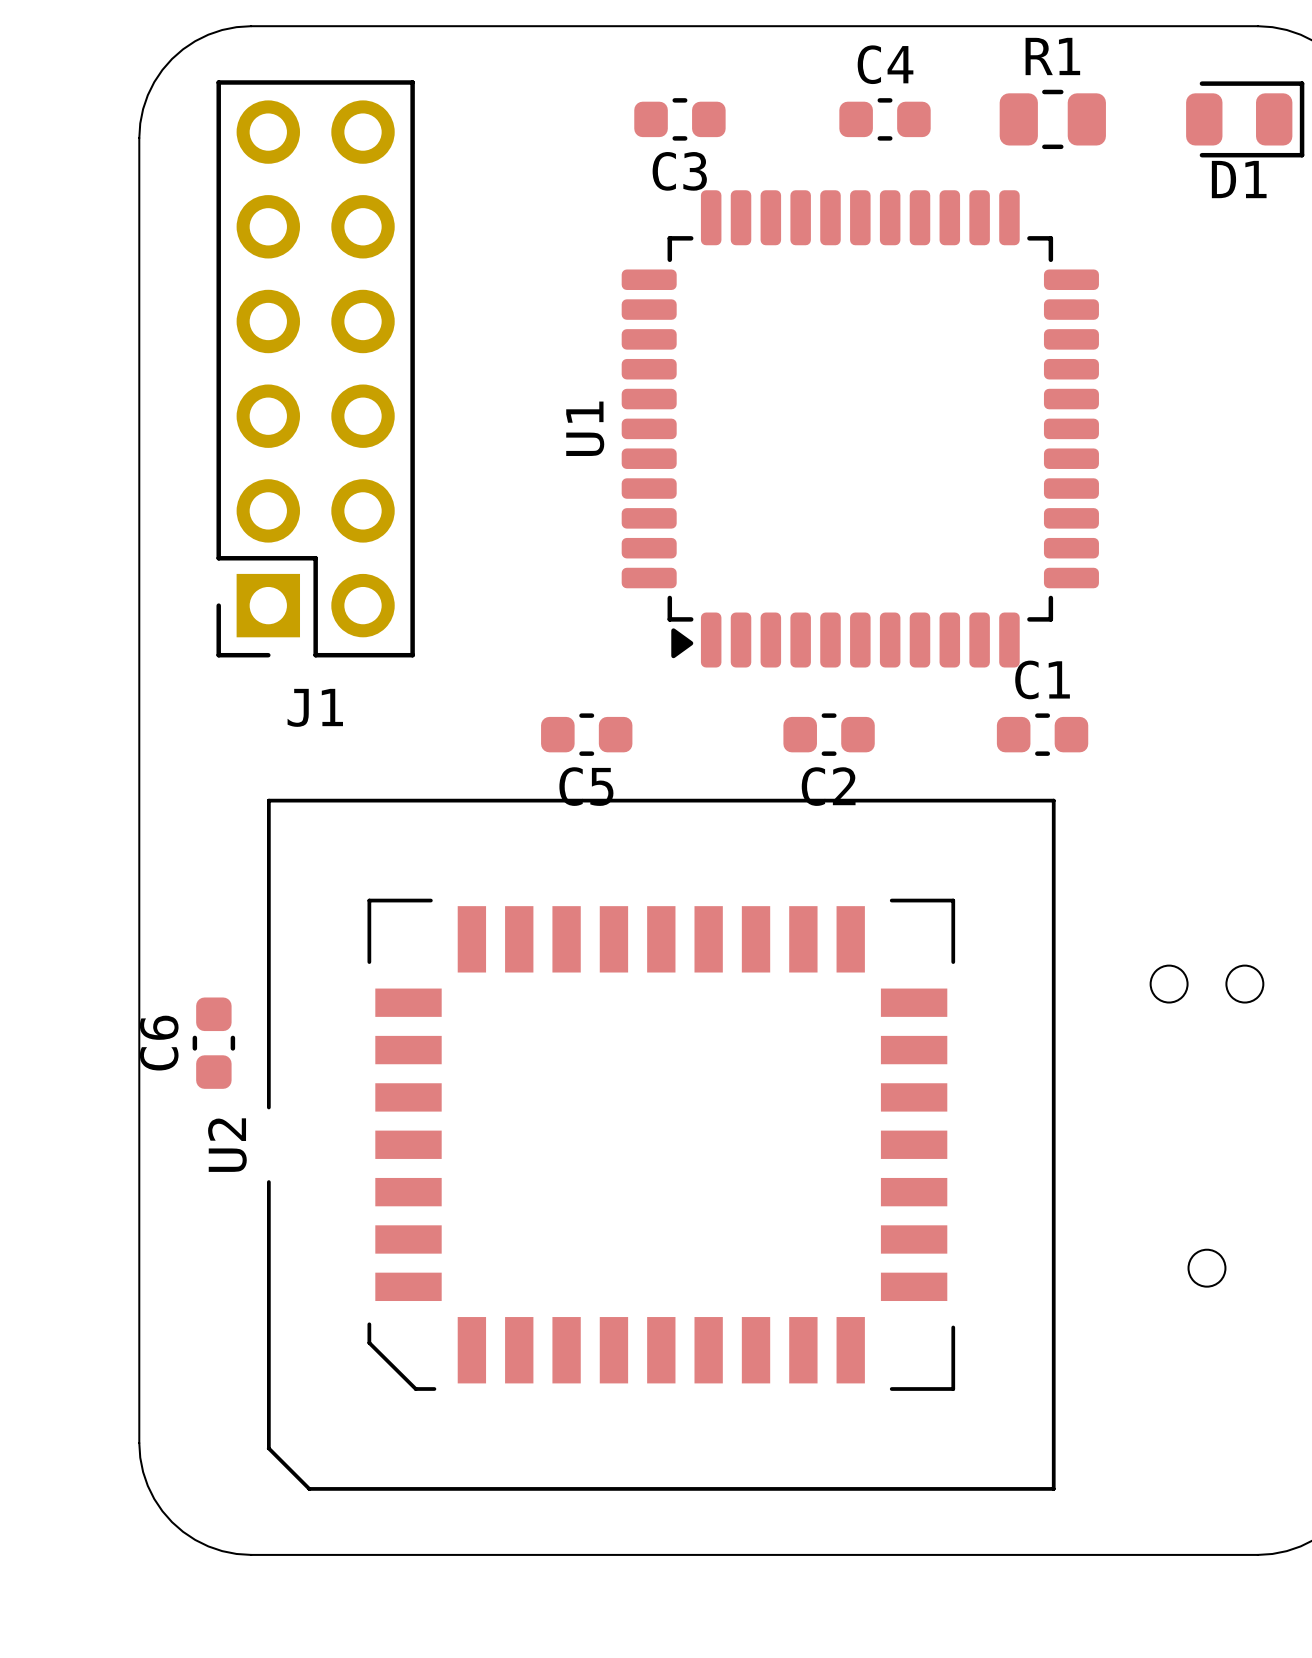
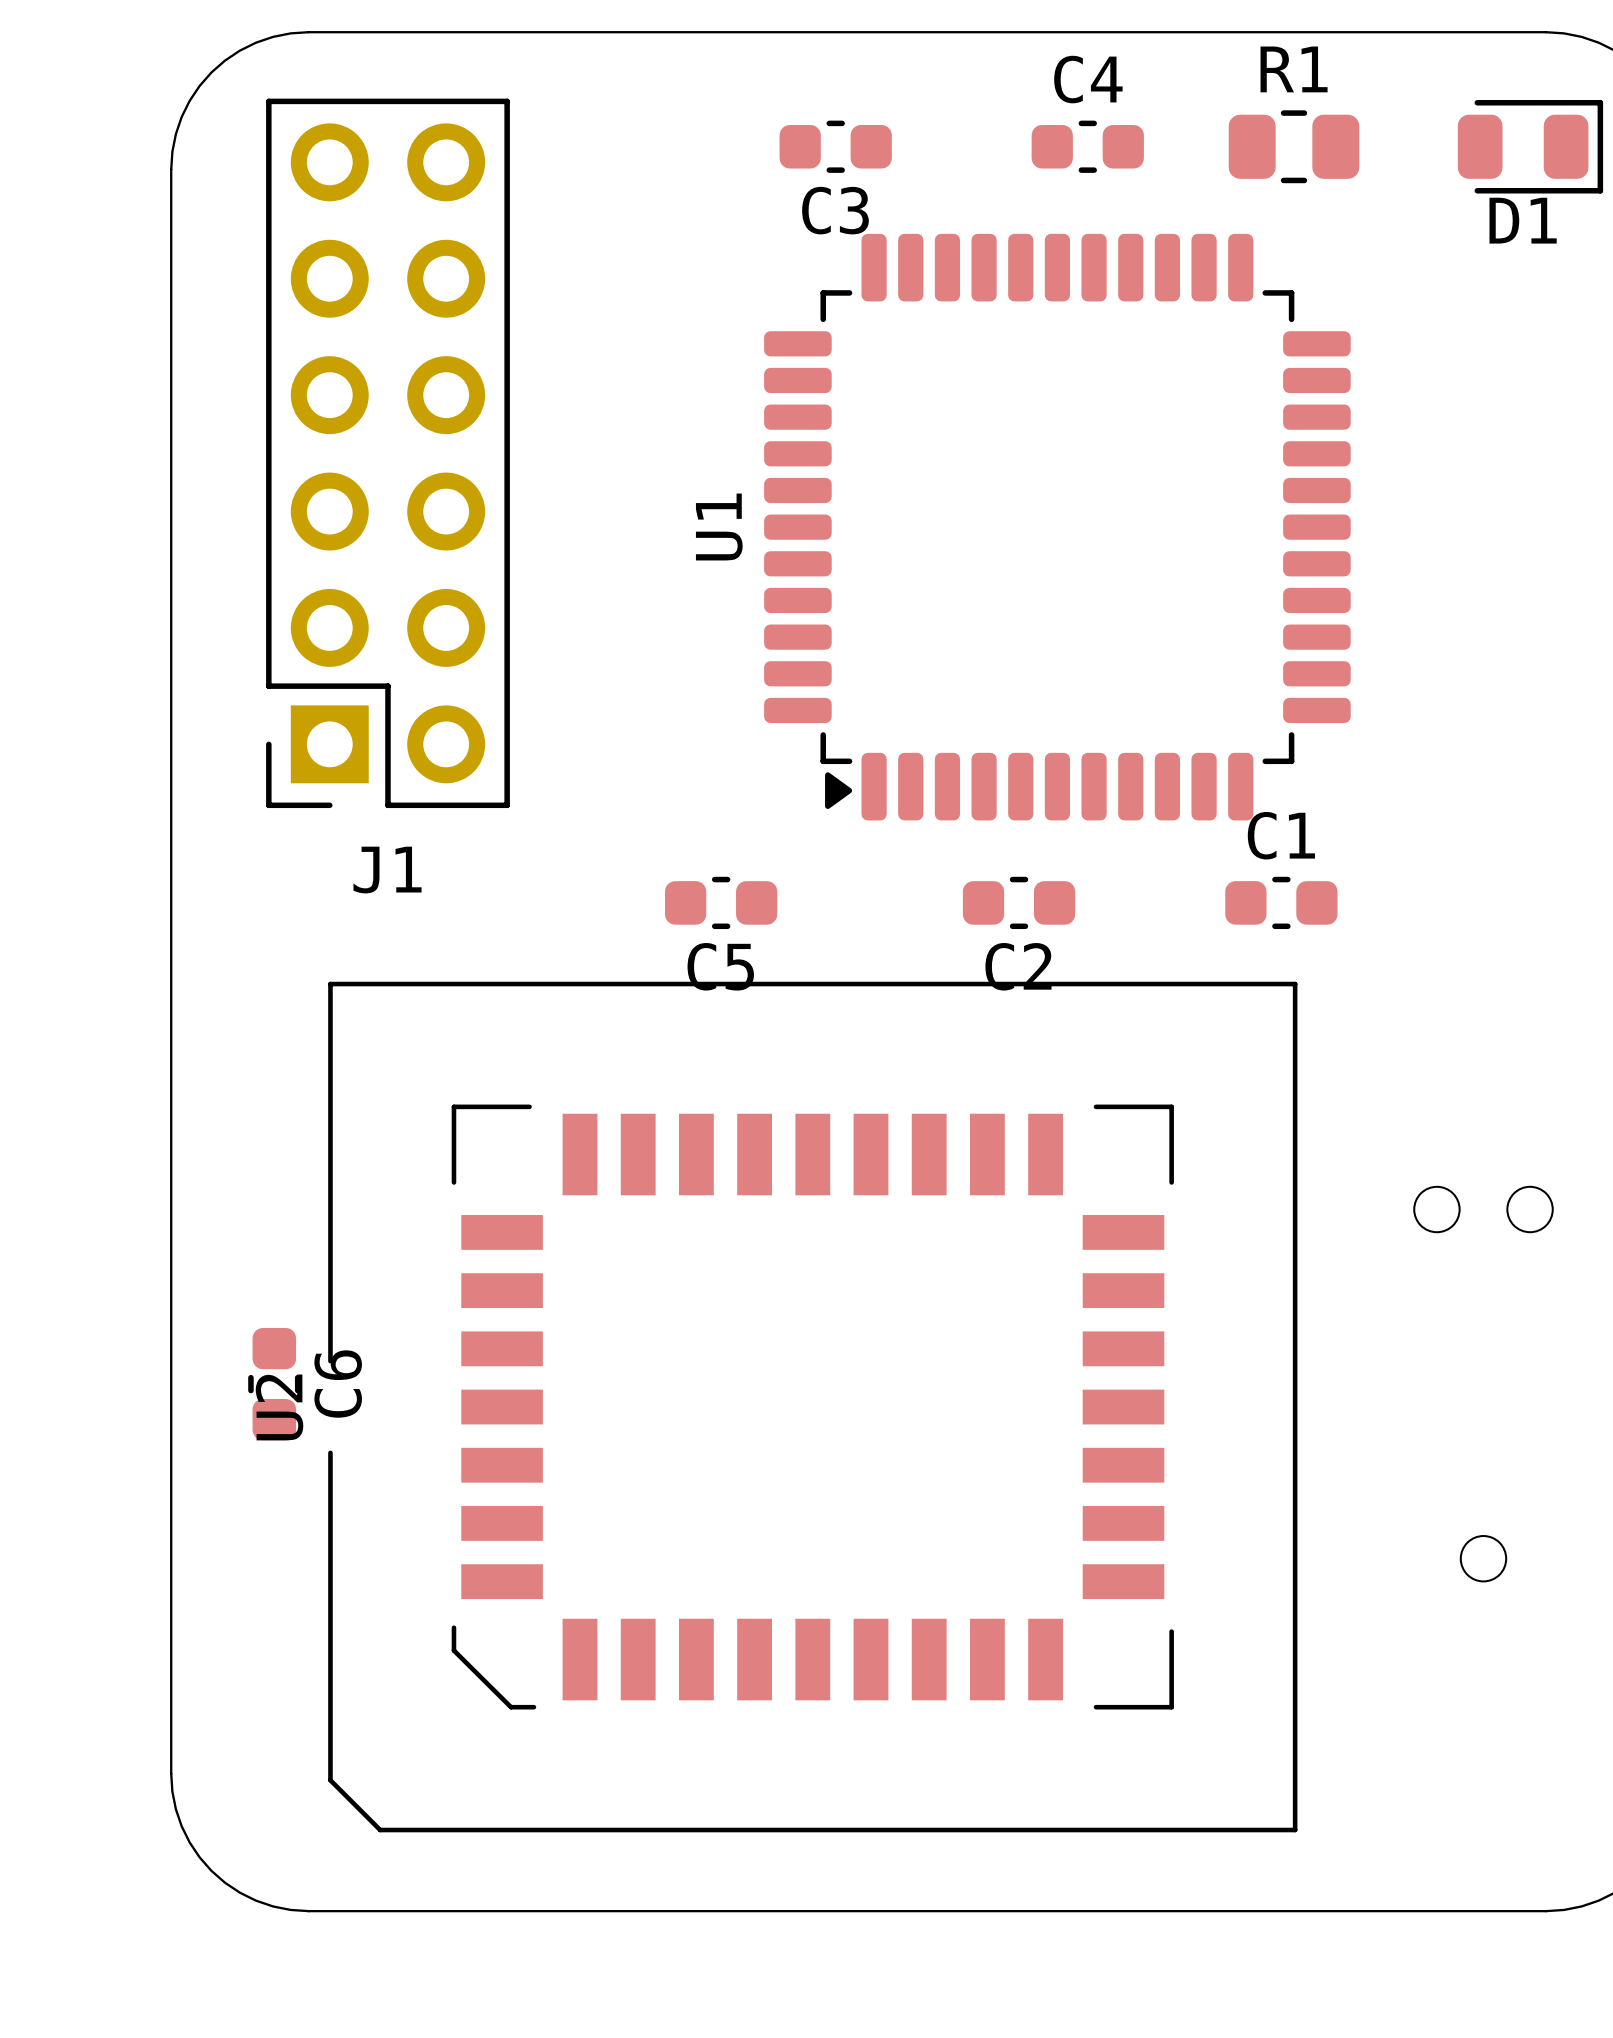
C6 name position: C6 (159, 1043) -> C6 (338, 1384)
C6 position: (213, 1043) -> (274, 1384)

